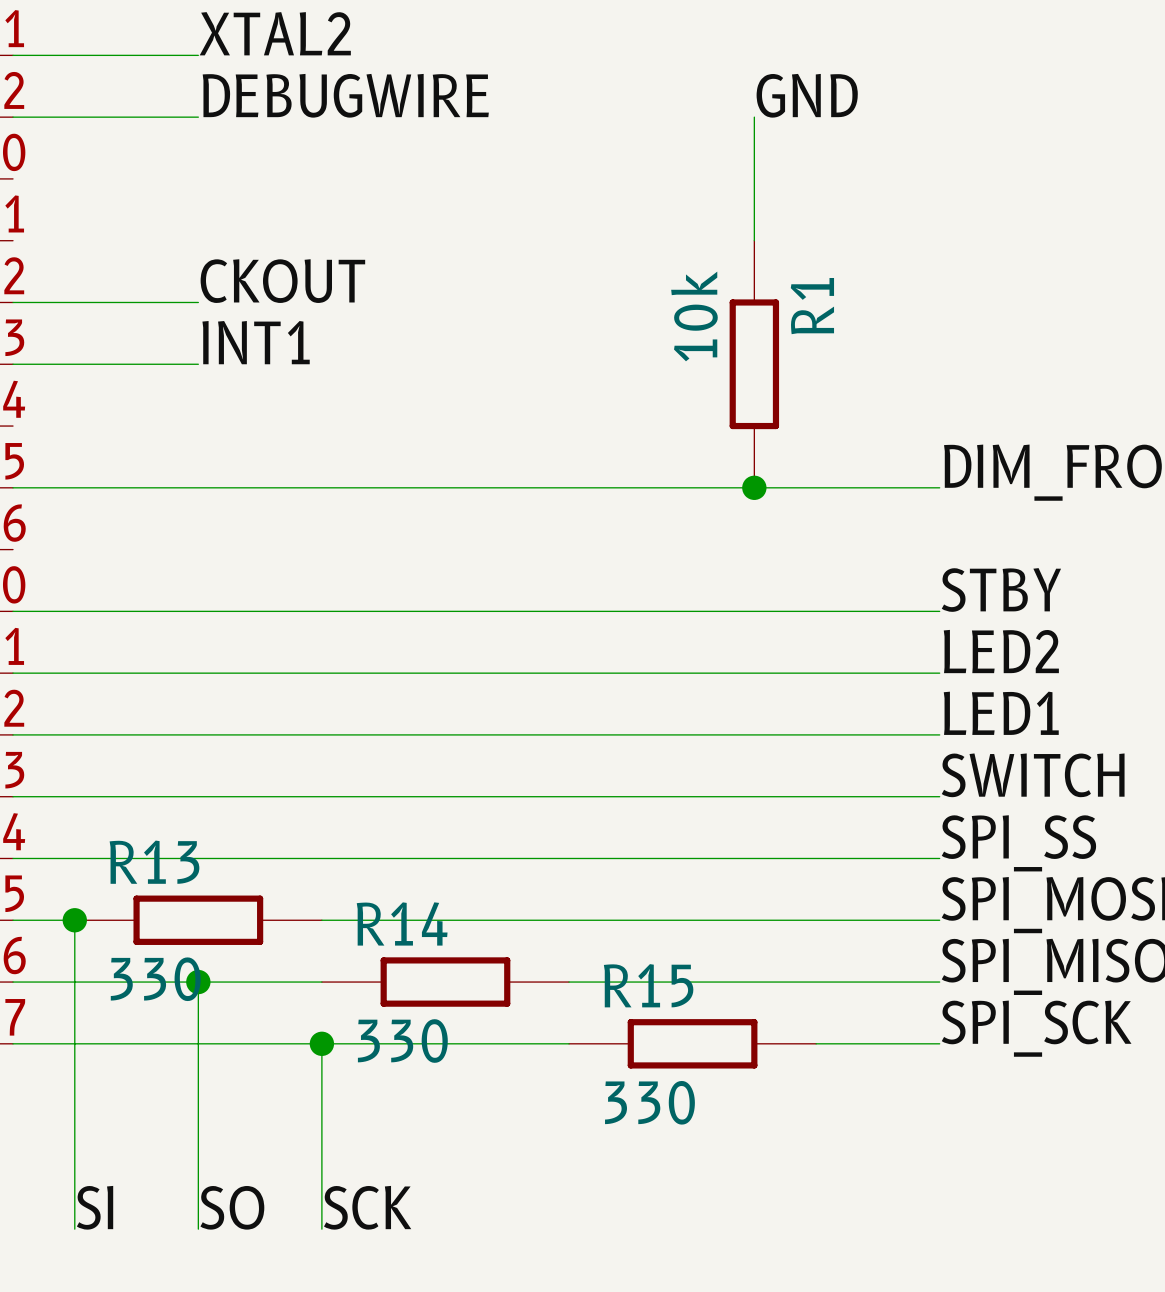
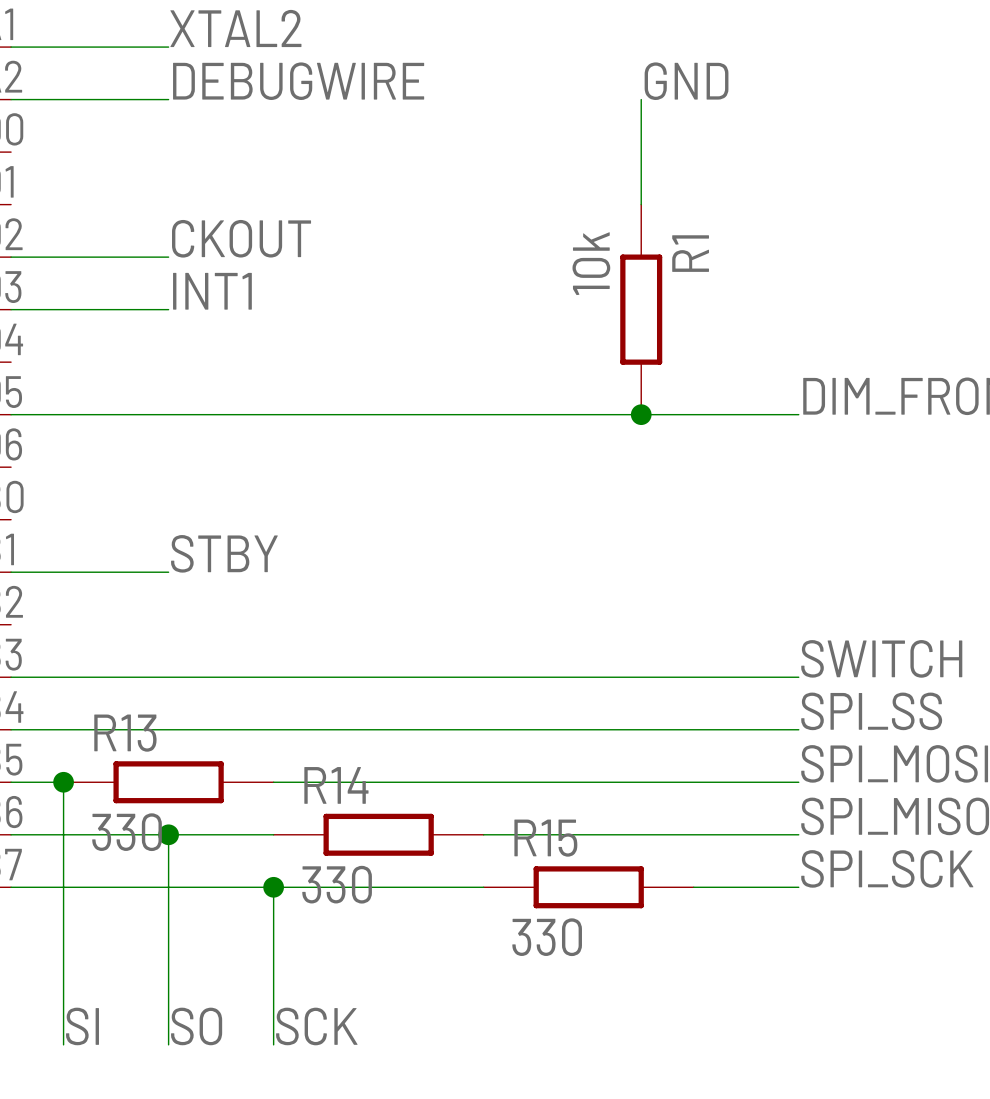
label: STBY (1001, 589) -> none
wire: (13, 611) (939, 611) -> none
label: none -> STBY (224, 553)
label: LED2 (1001, 651) -> none
wire: (198, 673) (939, 673) -> none
label: LED1 (1001, 713) -> none
wire: (13, 734) (939, 734) -> none

